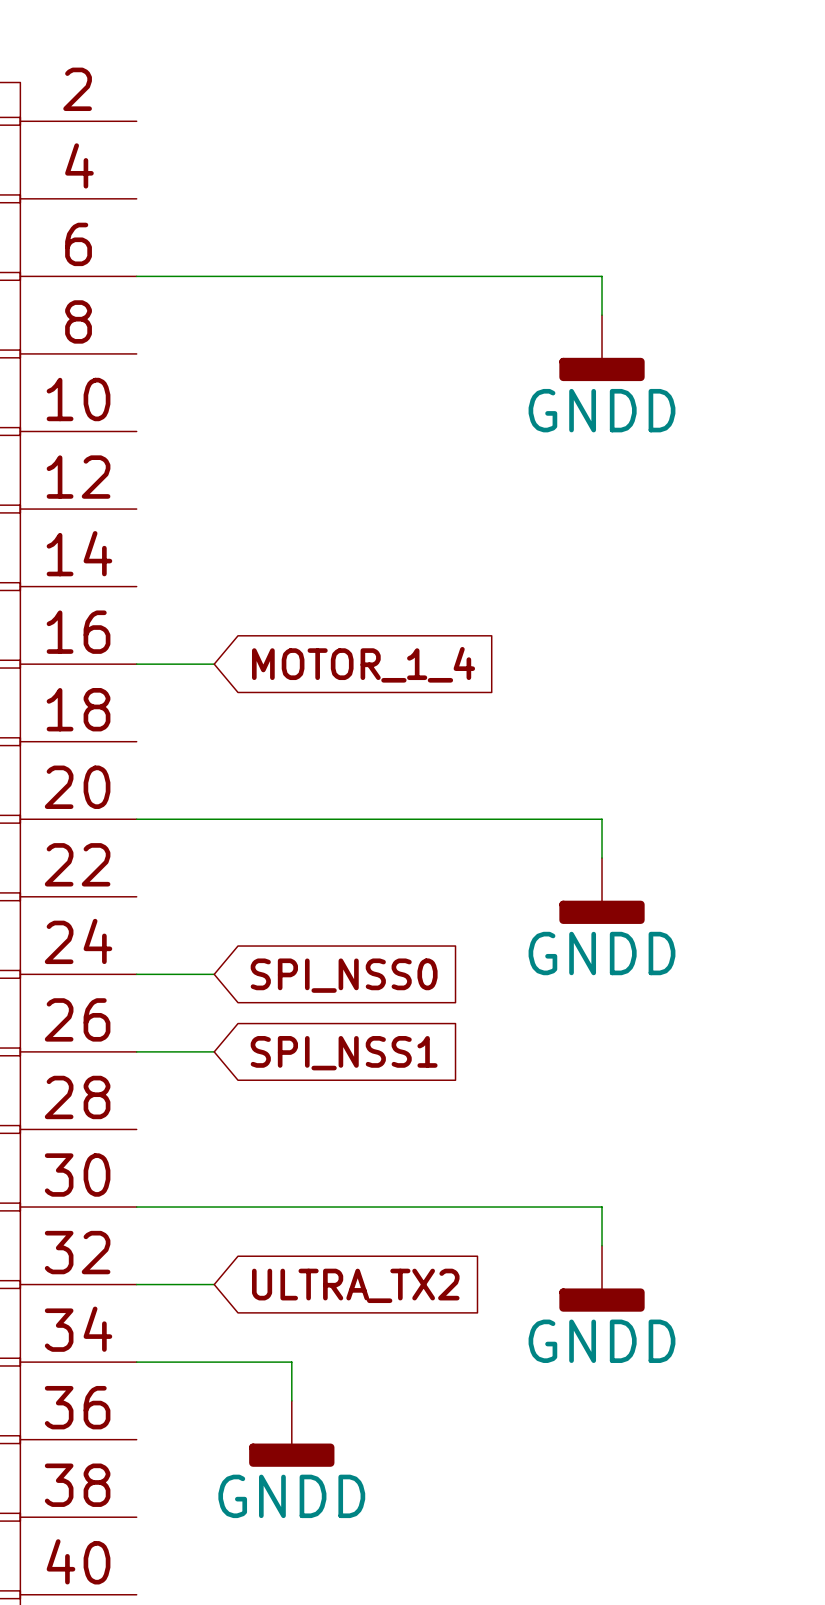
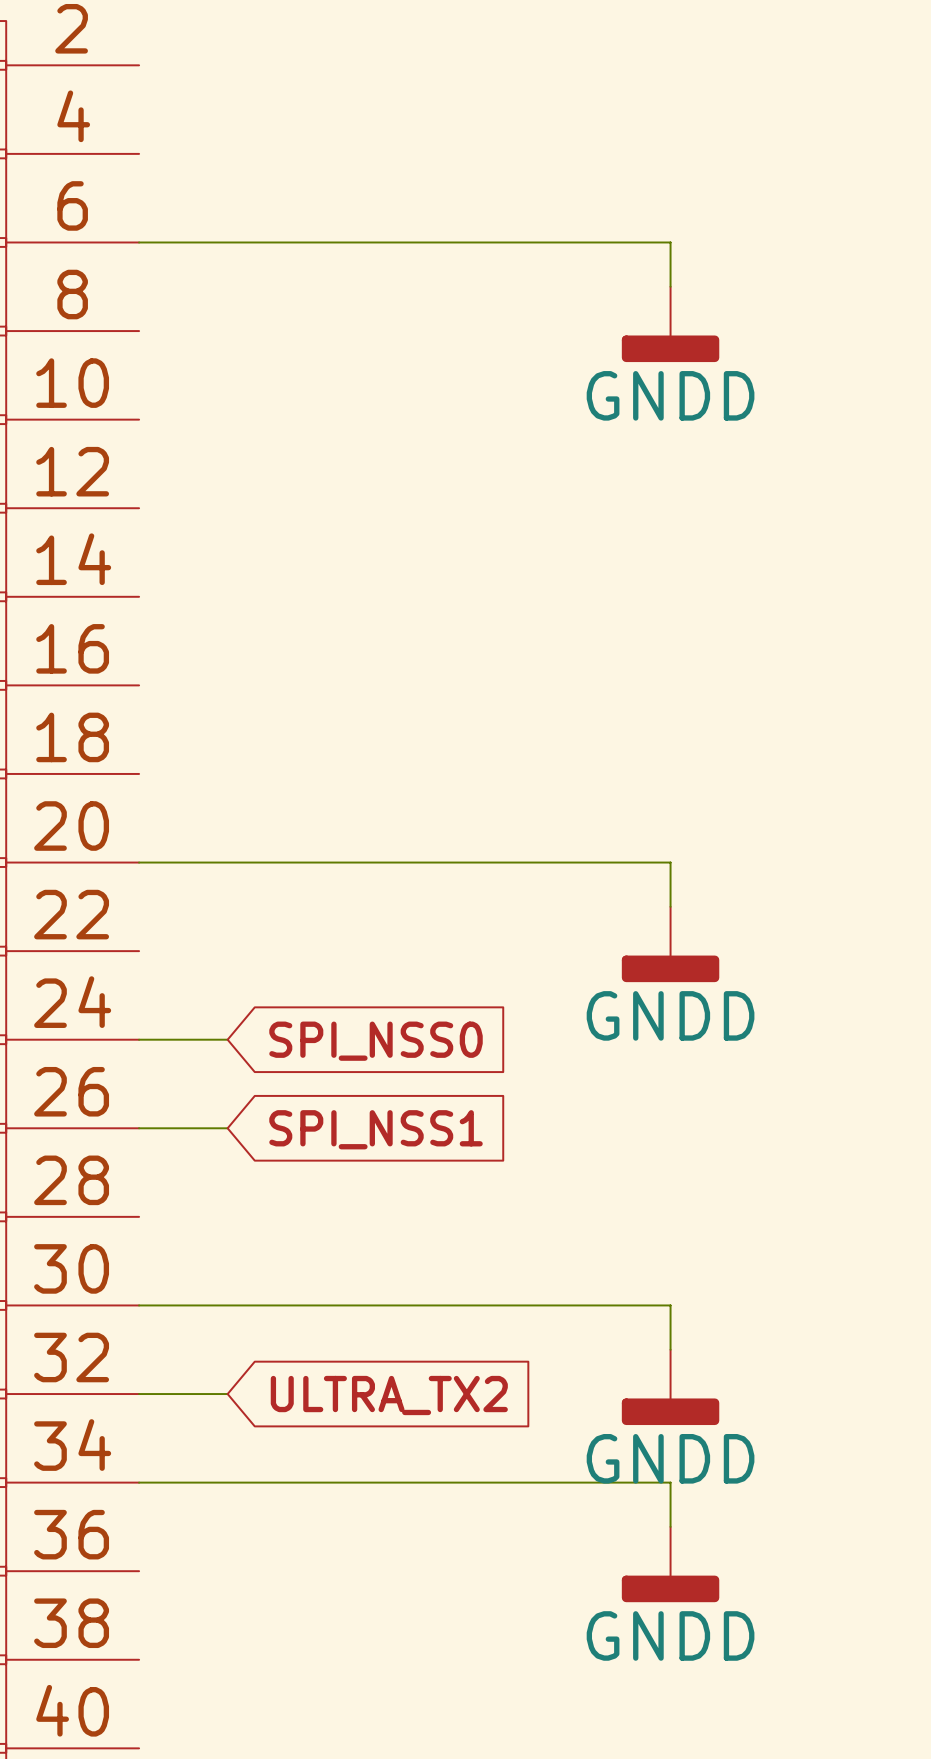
wire: (136, 664) (214, 664) -> none
global label: MOTOR_1_4 (363, 664) -> none
wire: (291, 1362) (291, 1400) -> (316, 1482) (670, 1482) (670, 1526)
power symbol position: GNDD (291, 1433) -> GNDD (670, 1564)

